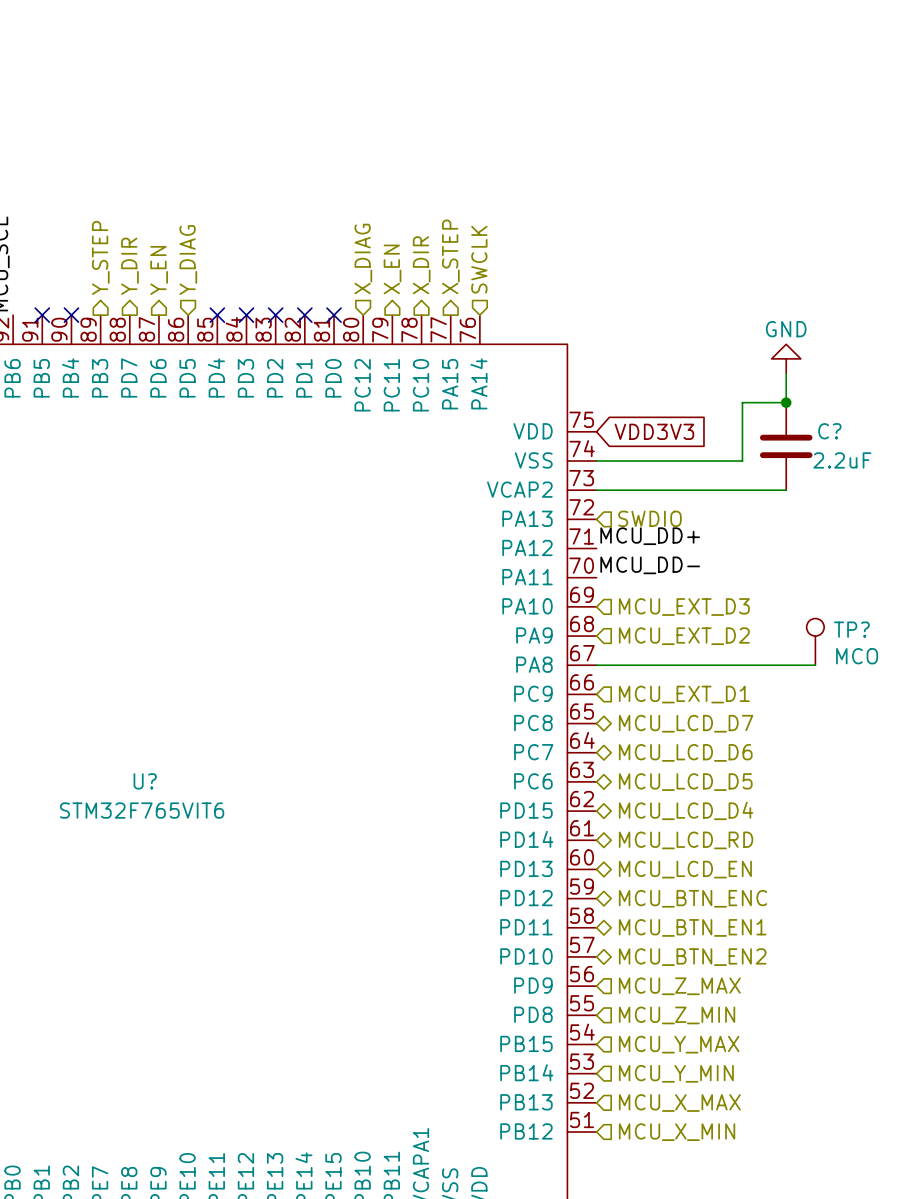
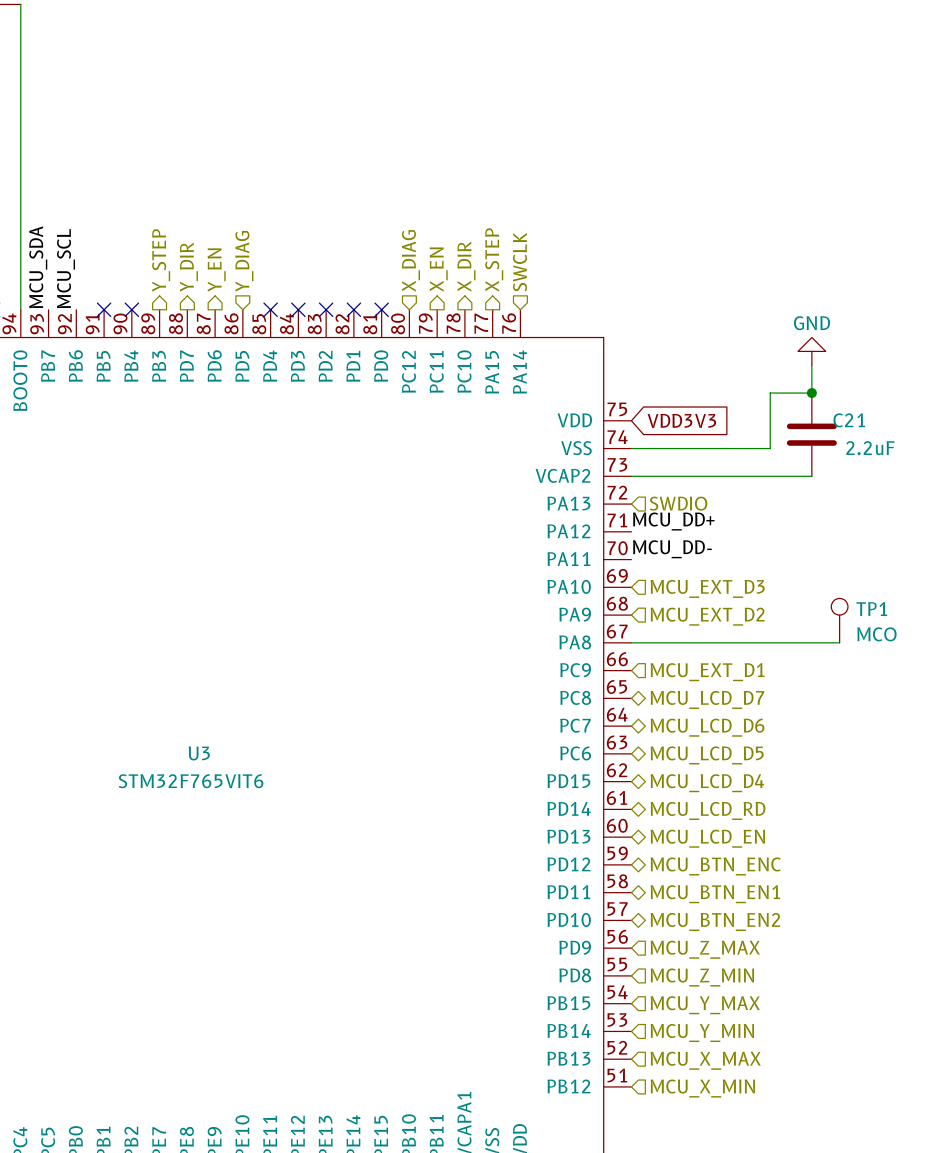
C? name: C? (829, 431) -> C21 (849, 420)
TP? name: TP? (851, 629) -> TP1 (871, 609)
U? name: U? (145, 781) -> U3 (199, 753)

